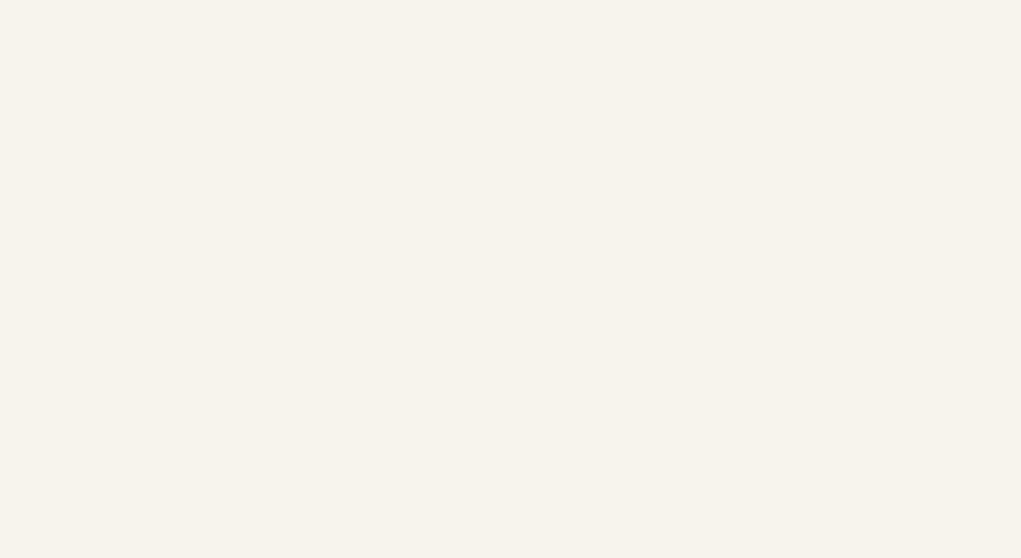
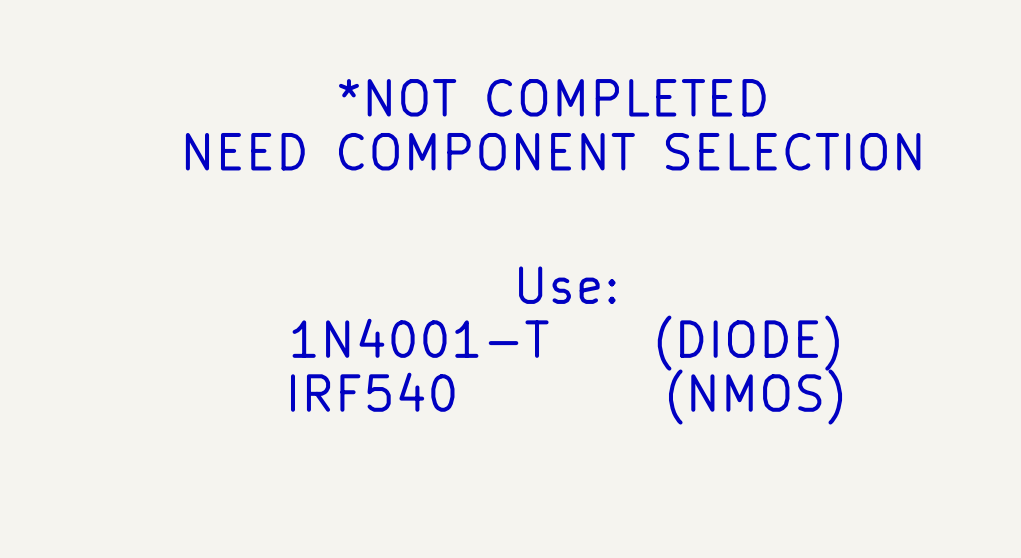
text: none -> *NOT COMPLETED (552, 97)
text: none -> NEED COMPONENT SELECTION (553, 151)
text: none -> Use: (567, 285)
text: none -> 1N4001-T (DIODE) (565, 343)
text: none -> IRF540 (NMOS) (566, 397)

